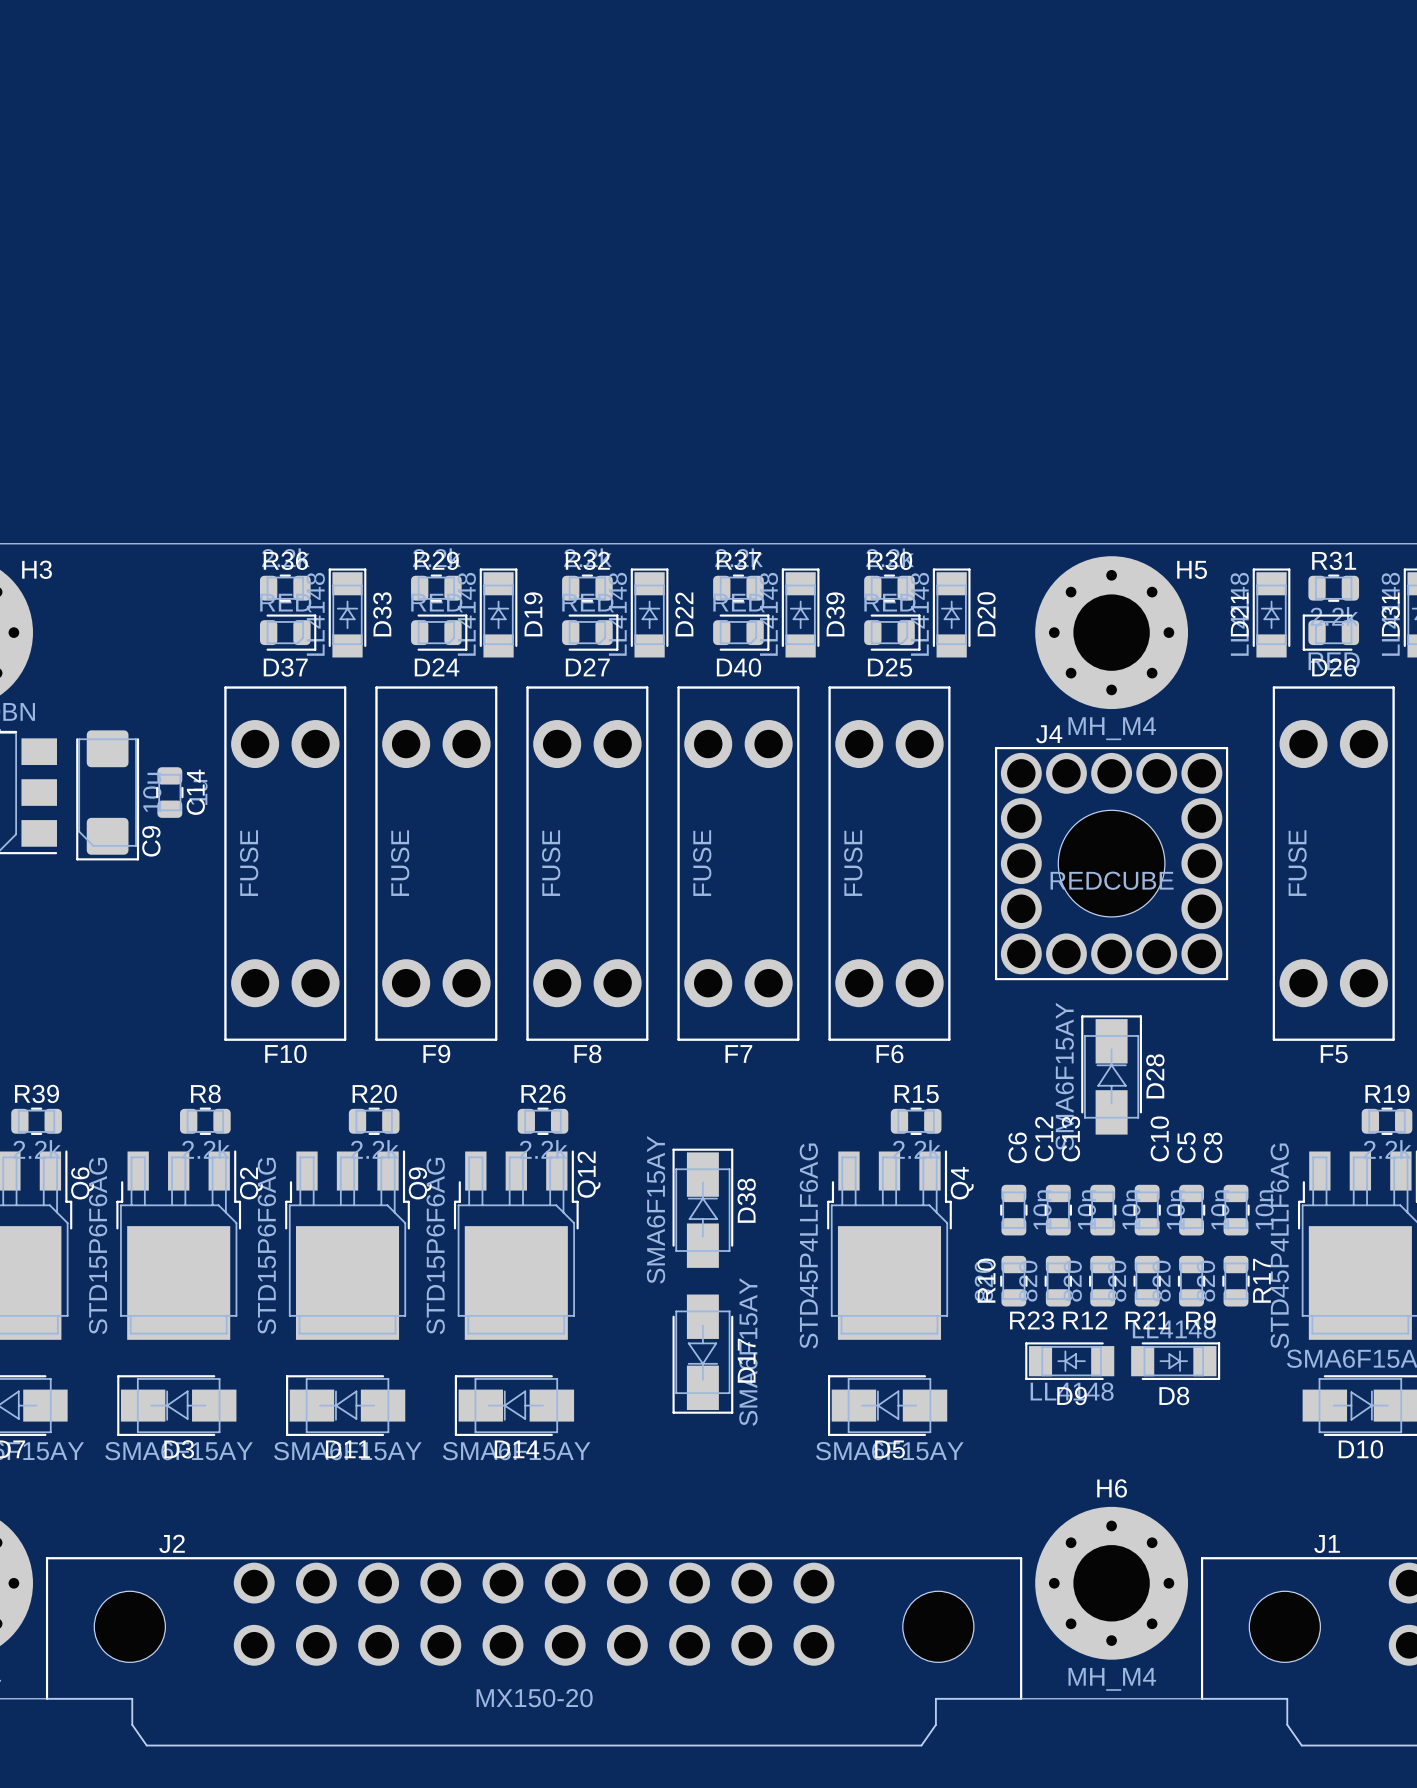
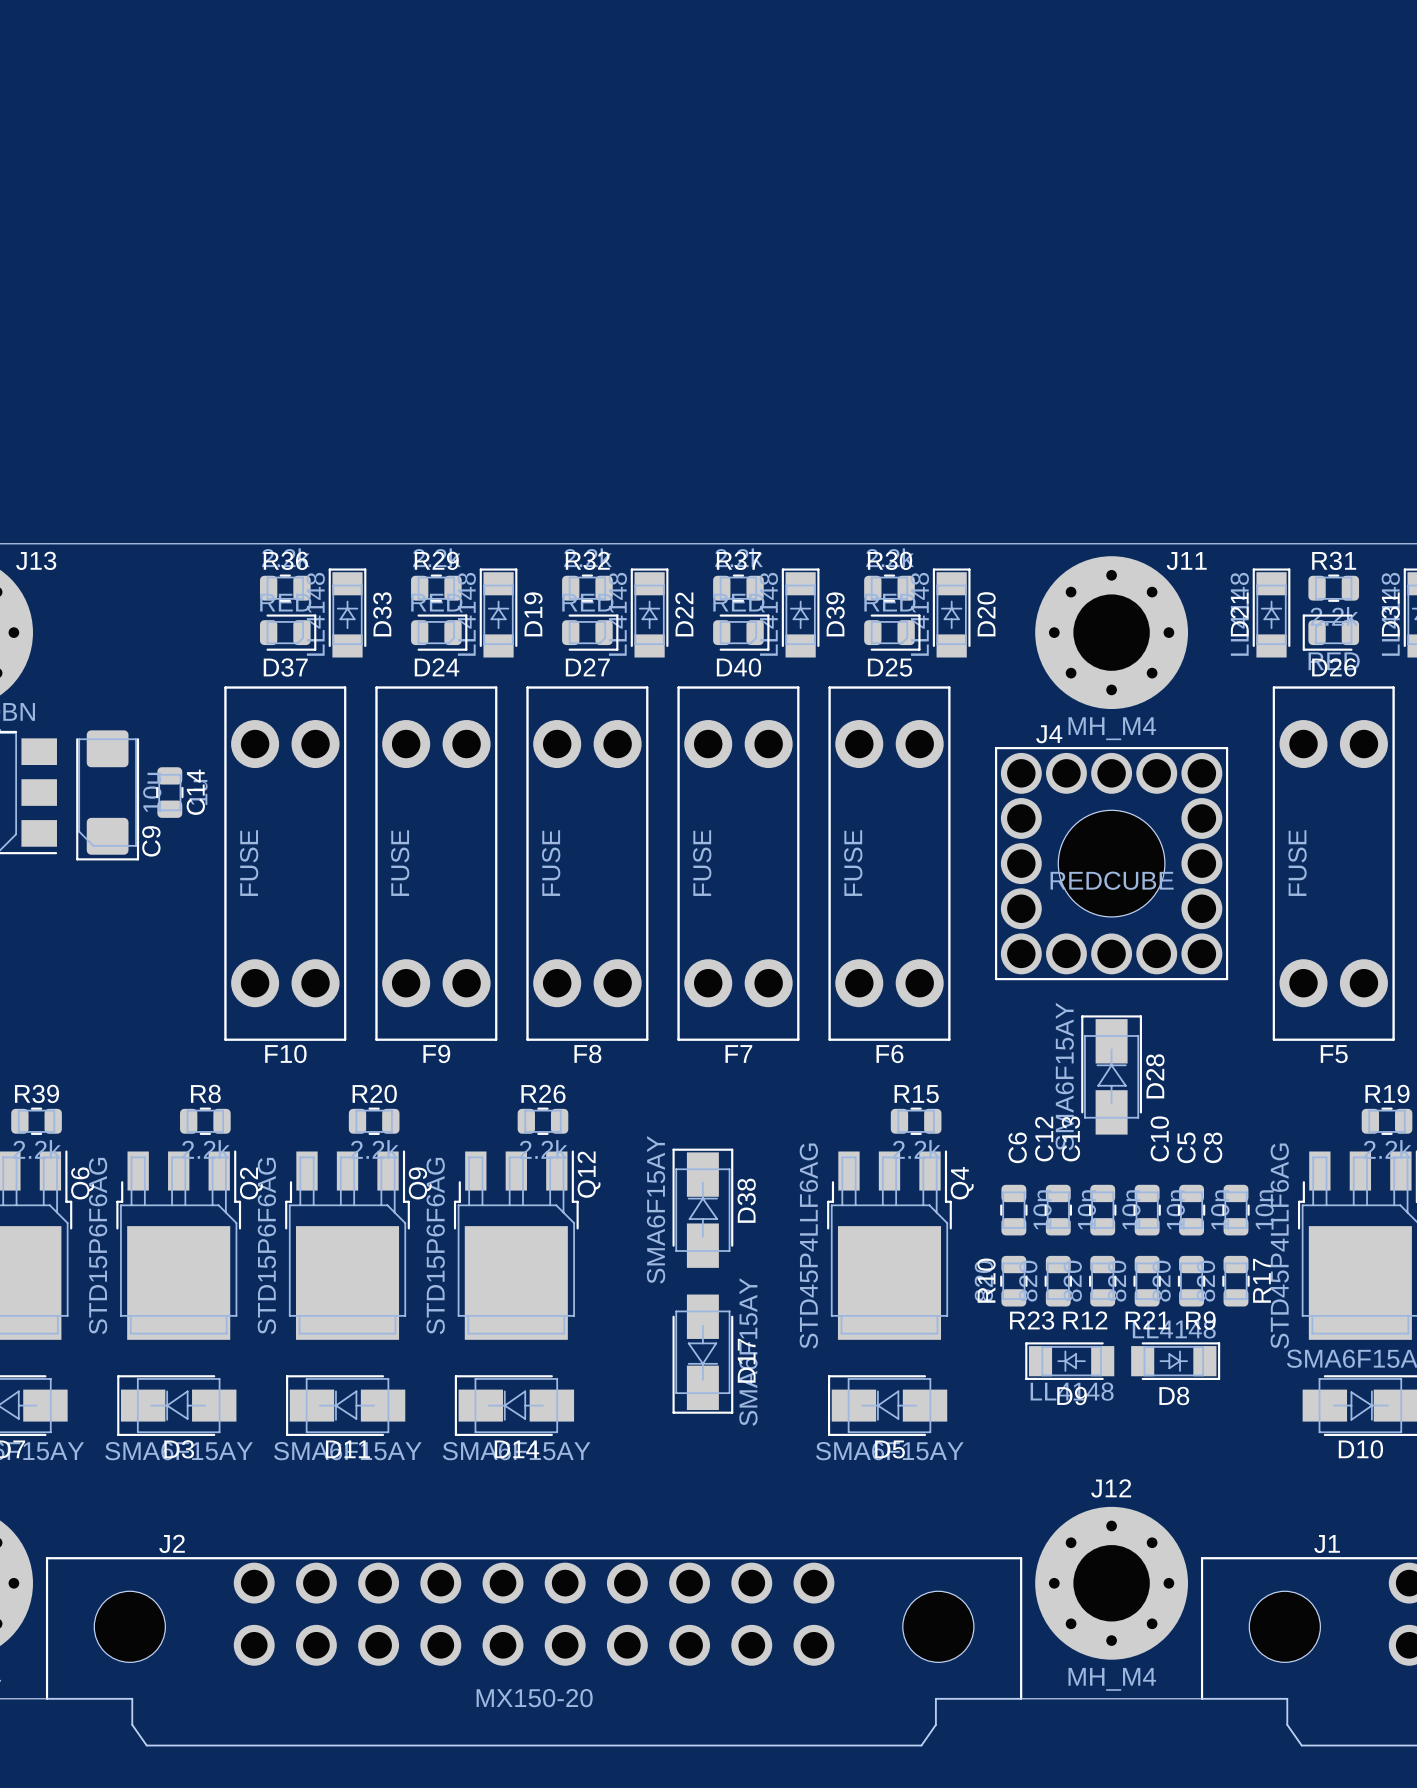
H3 name: H3 (37, 569) -> J13 (36, 560)
H5 name: H5 (1192, 569) -> J11 (1186, 561)
H6 name: H6 (1112, 1488) -> J12 (1111, 1488)

